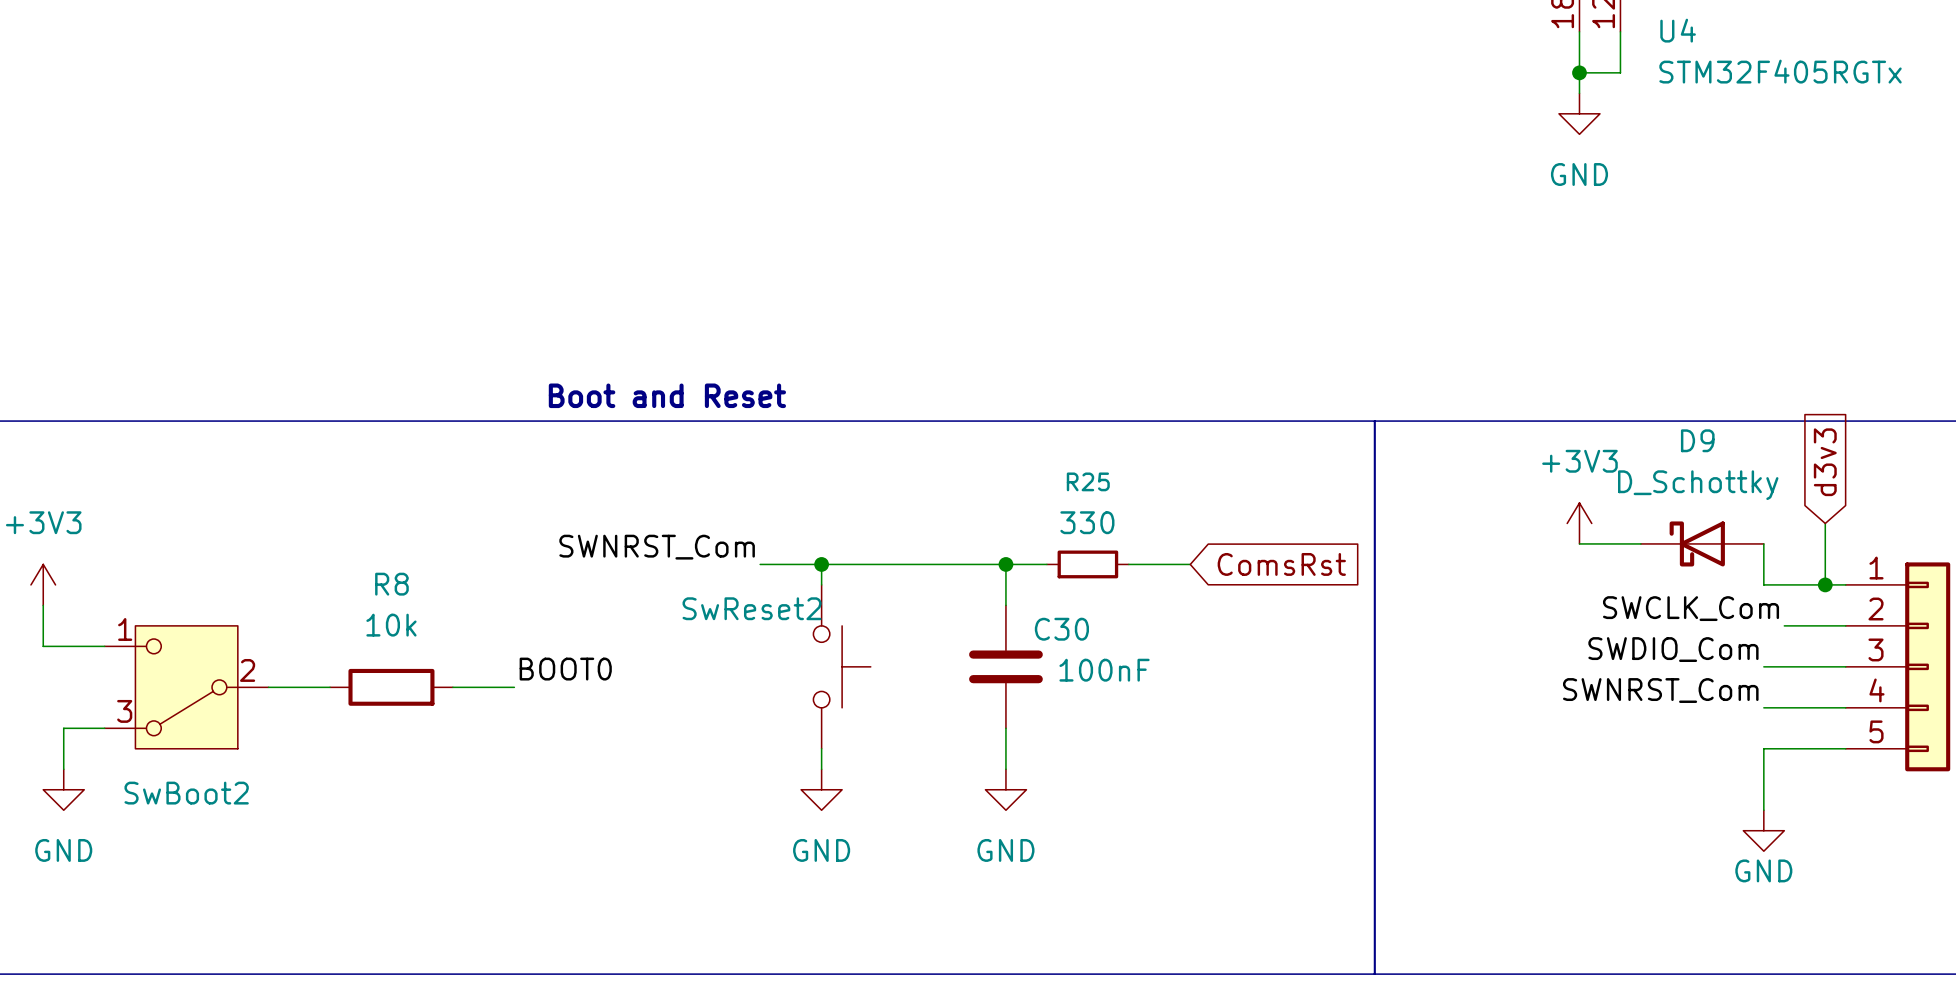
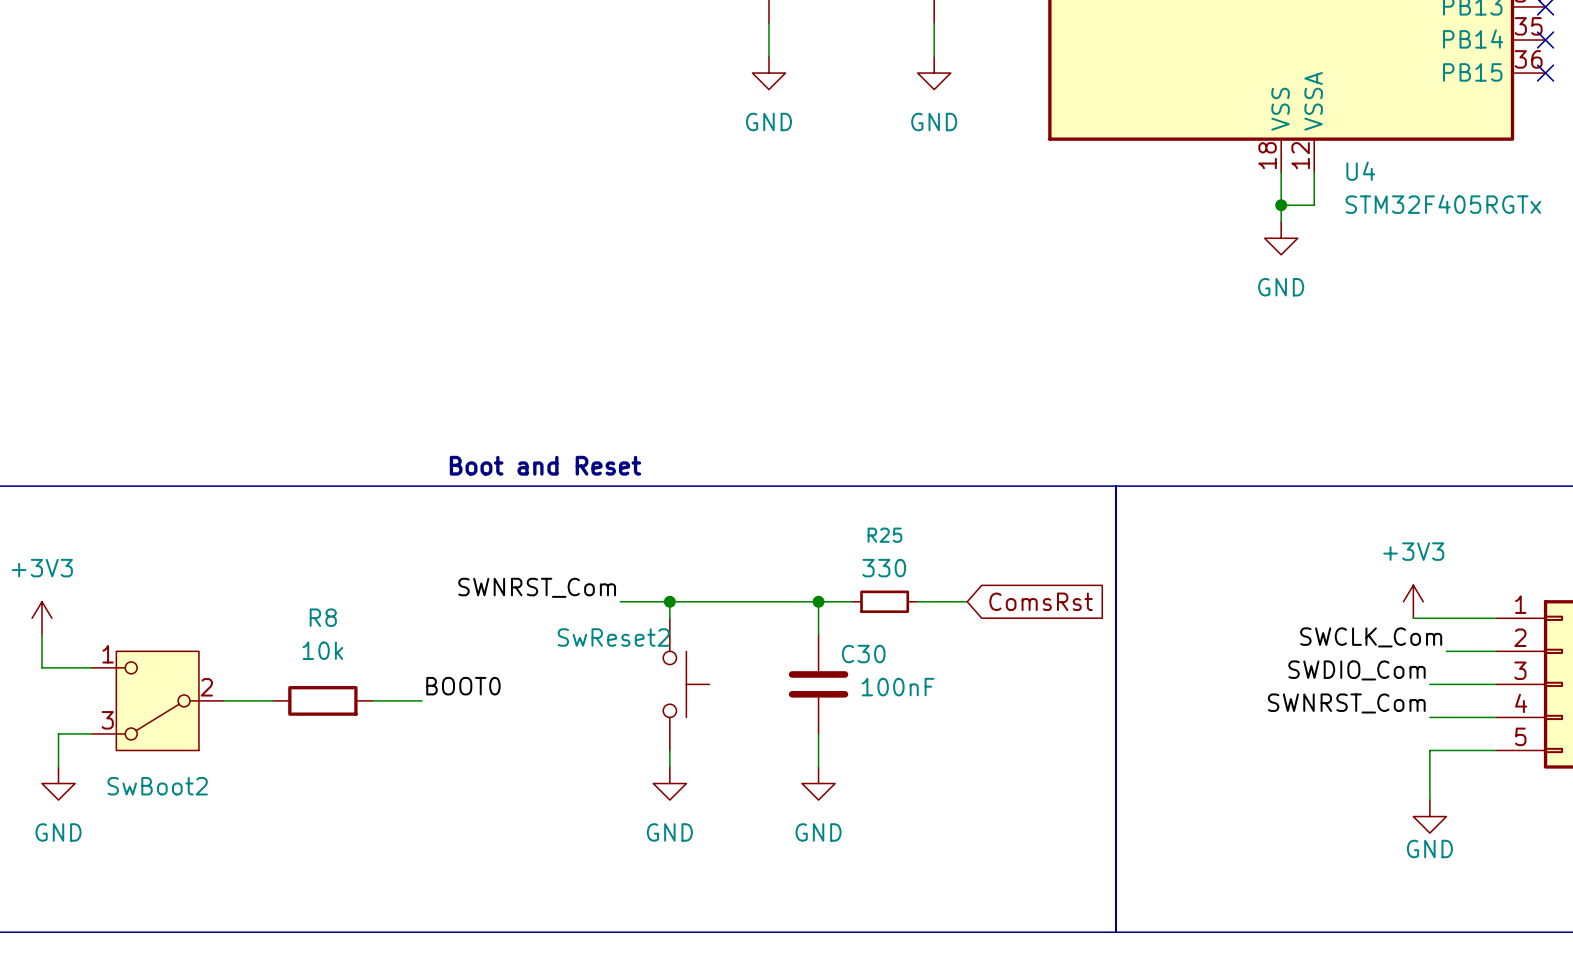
global label: d3v3 (1825, 462) -> none
power symbol position: +3V3 (1579, 523) -> +3V3 (1413, 601)
wire: (1825, 523) (1825, 584) -> none
wire: (1579, 543) (1640, 543) -> none
D9: D_Schottky (1702, 543) -> none
wire: (1763, 543) (1763, 584) -> (1413, 618) (1429, 618)
junction: (1825, 584) -> none

